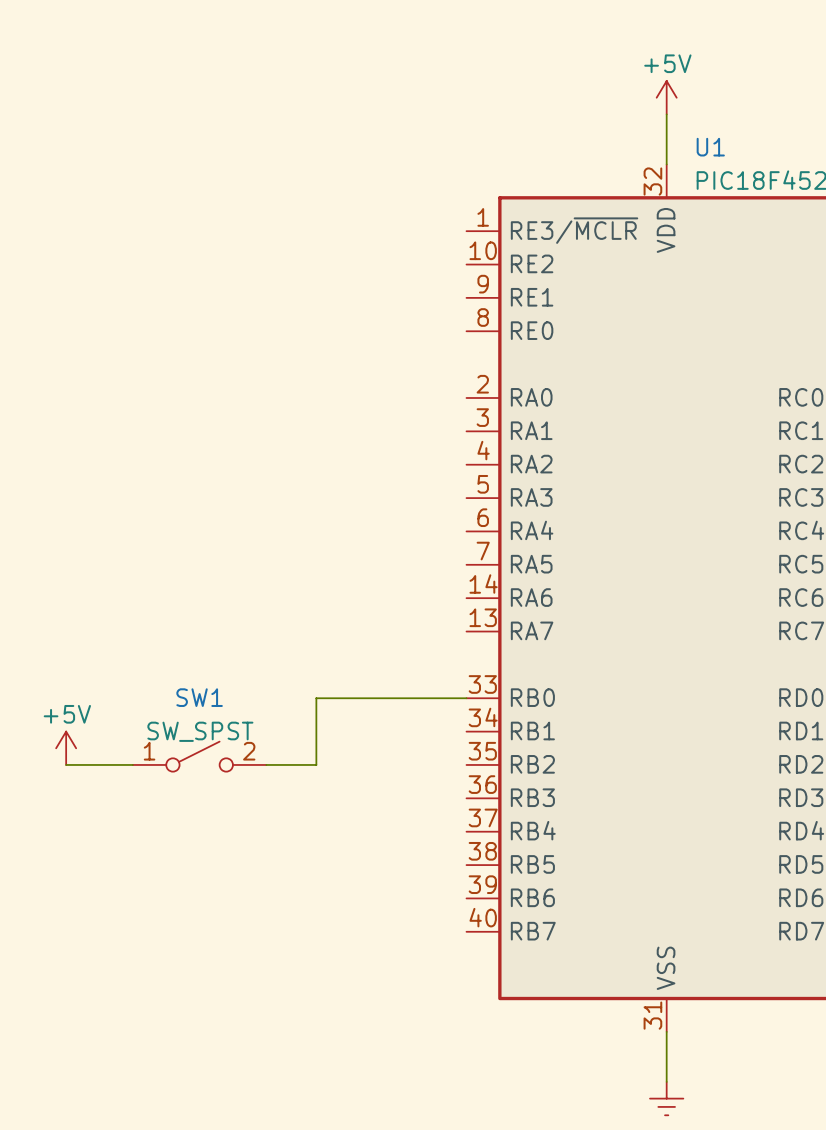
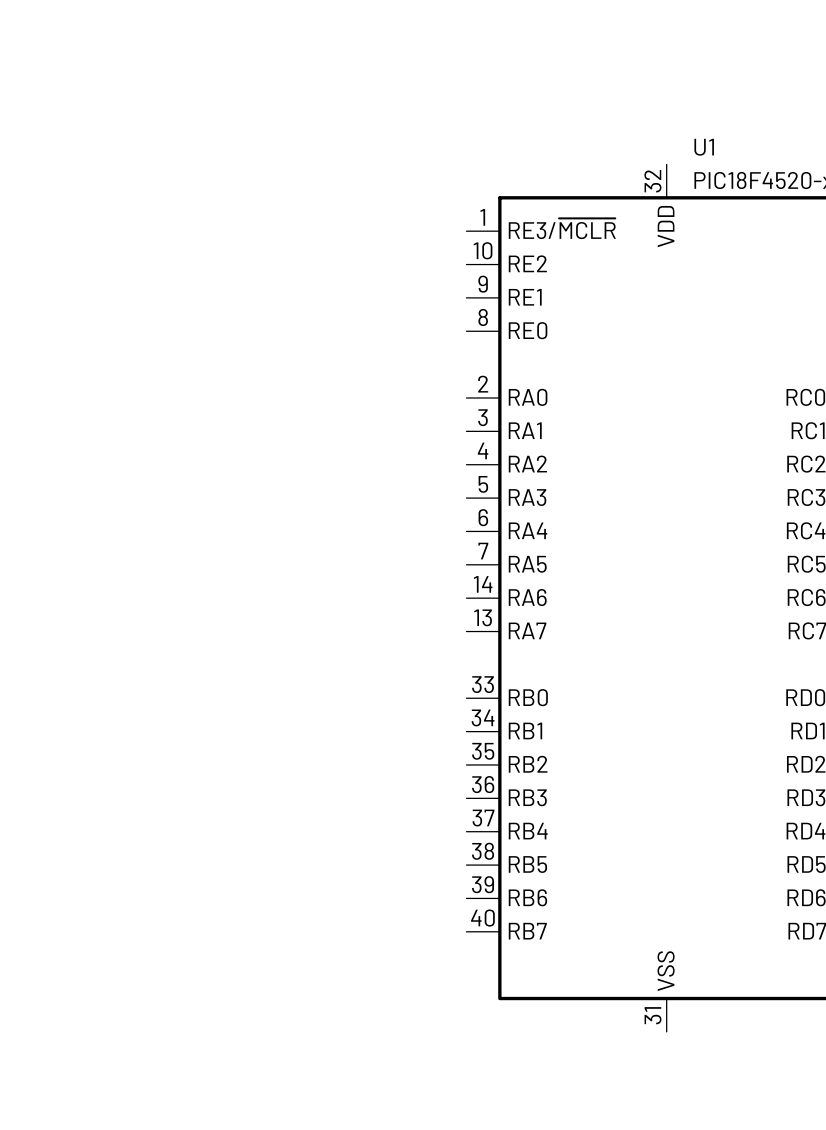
power symbol: +5V (666, 97) -> none
wire: (666, 114) (666, 164) -> none
wire: (466, 698) (316, 698) (316, 764) (266, 764) -> none
power symbol: +5V (66, 748) -> none
SW1: SW_SPST (199, 756) -> none
wire: (66, 764) (132, 764) -> none
wire: (666, 1031) (666, 1081) -> none
power symbol: (666, 1098) -> none

